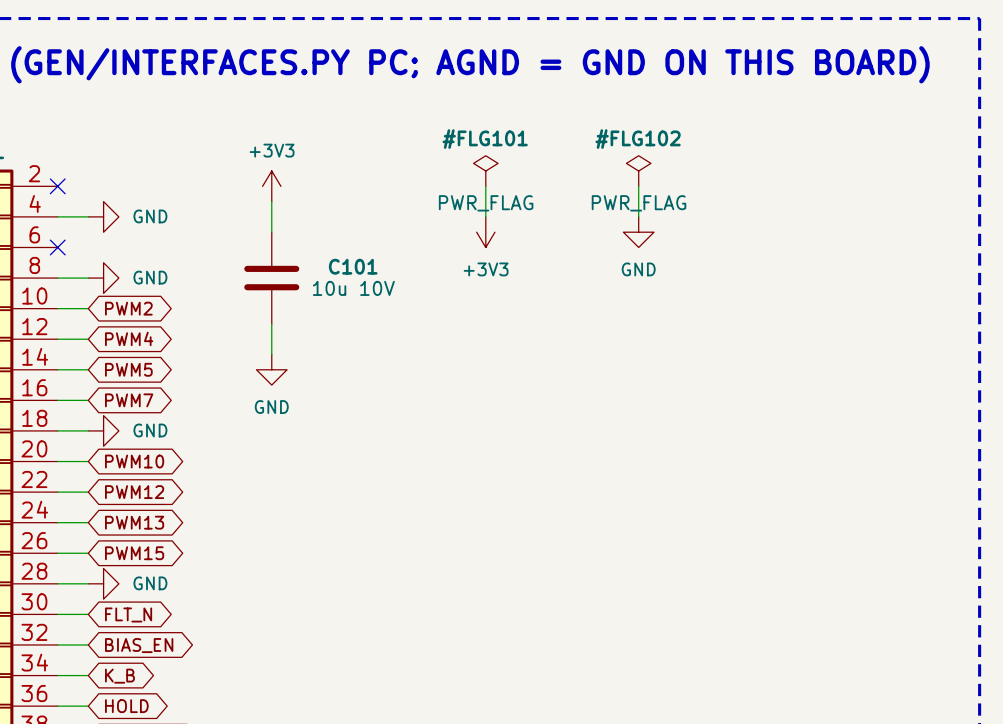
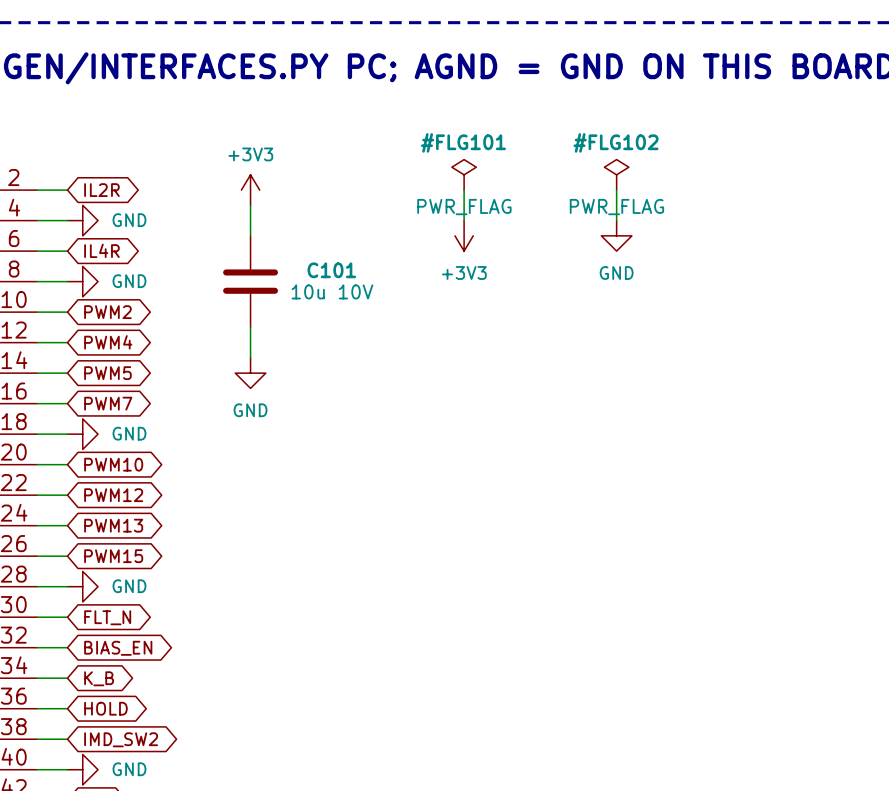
wire: none -> (37, 190) (67, 190)
no-connect mark: (57, 186) -> none
global label: none -> IL2R (101, 190)
wire: none -> (37, 251) (67, 251)
no-connect mark: (57, 247) -> none
global label: none -> IL4R (101, 250)

